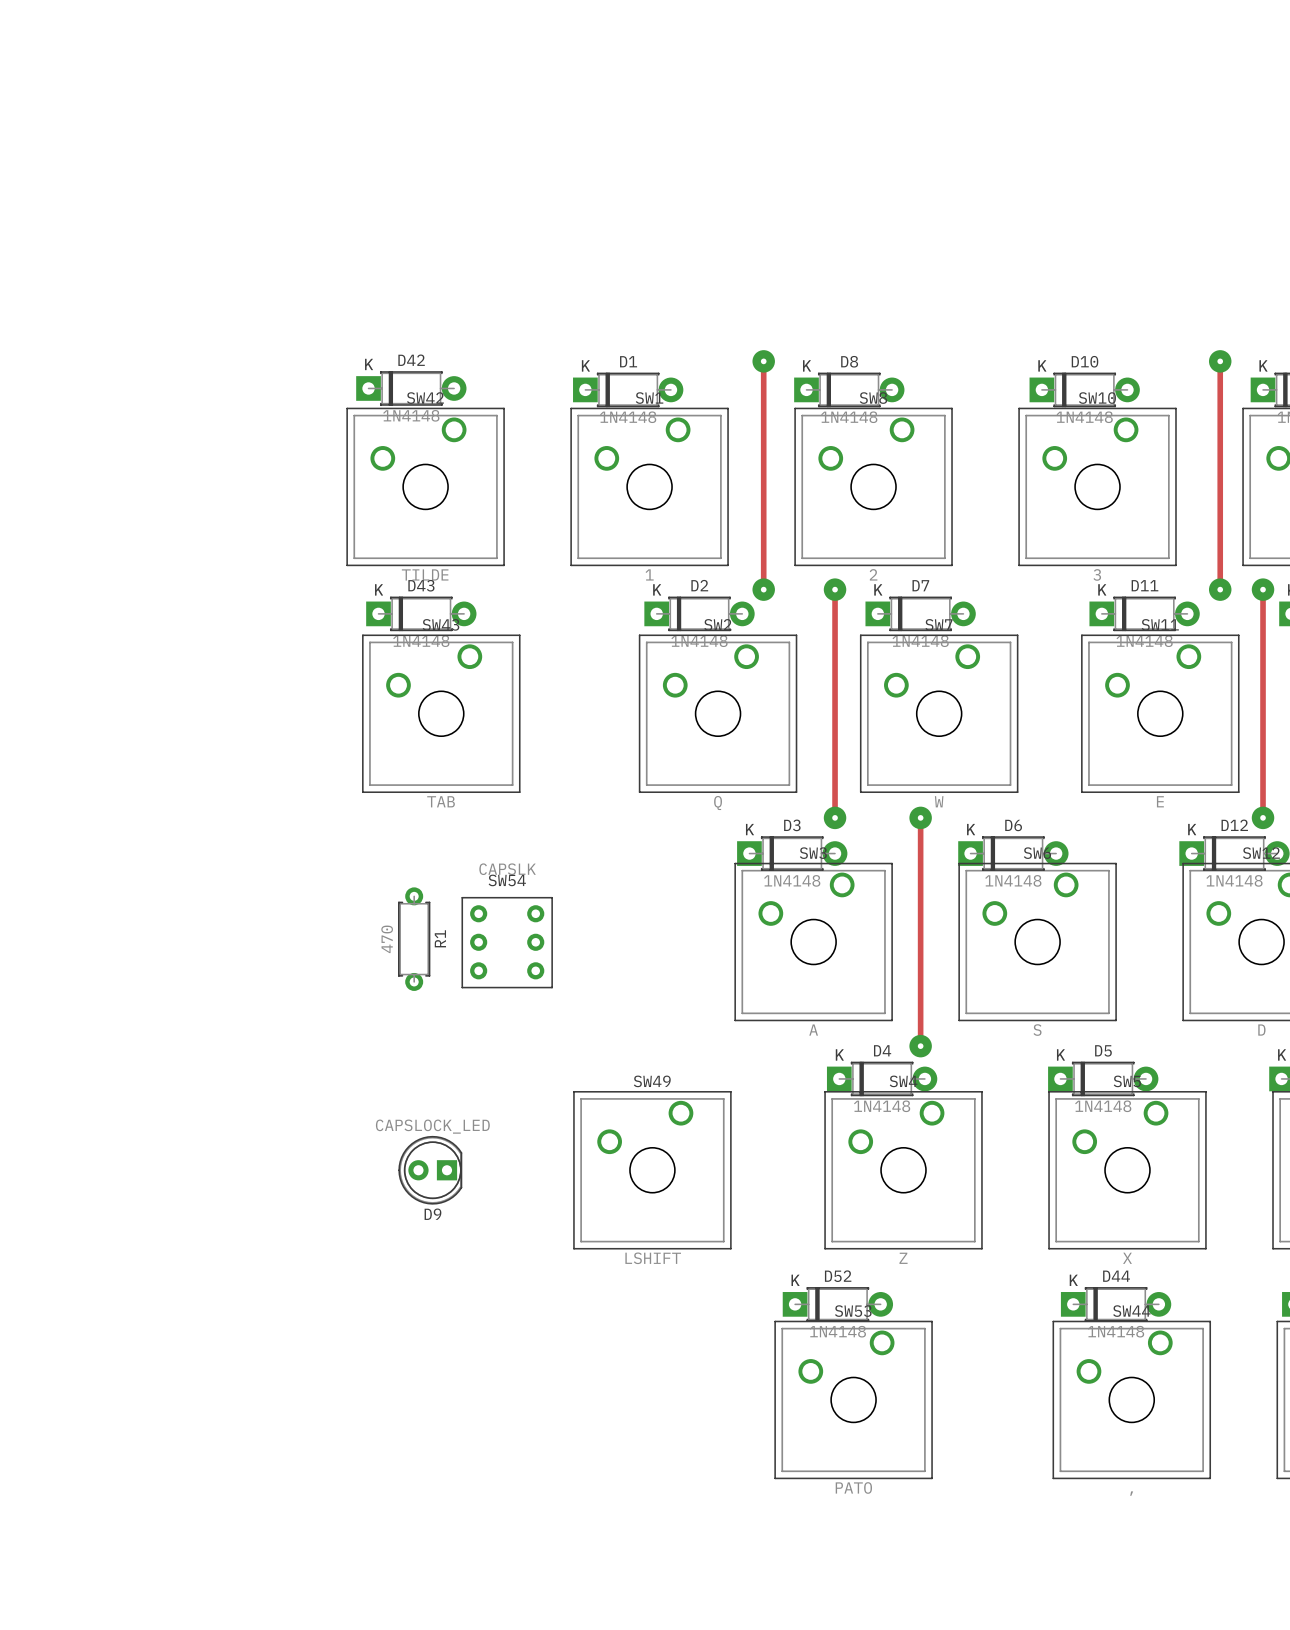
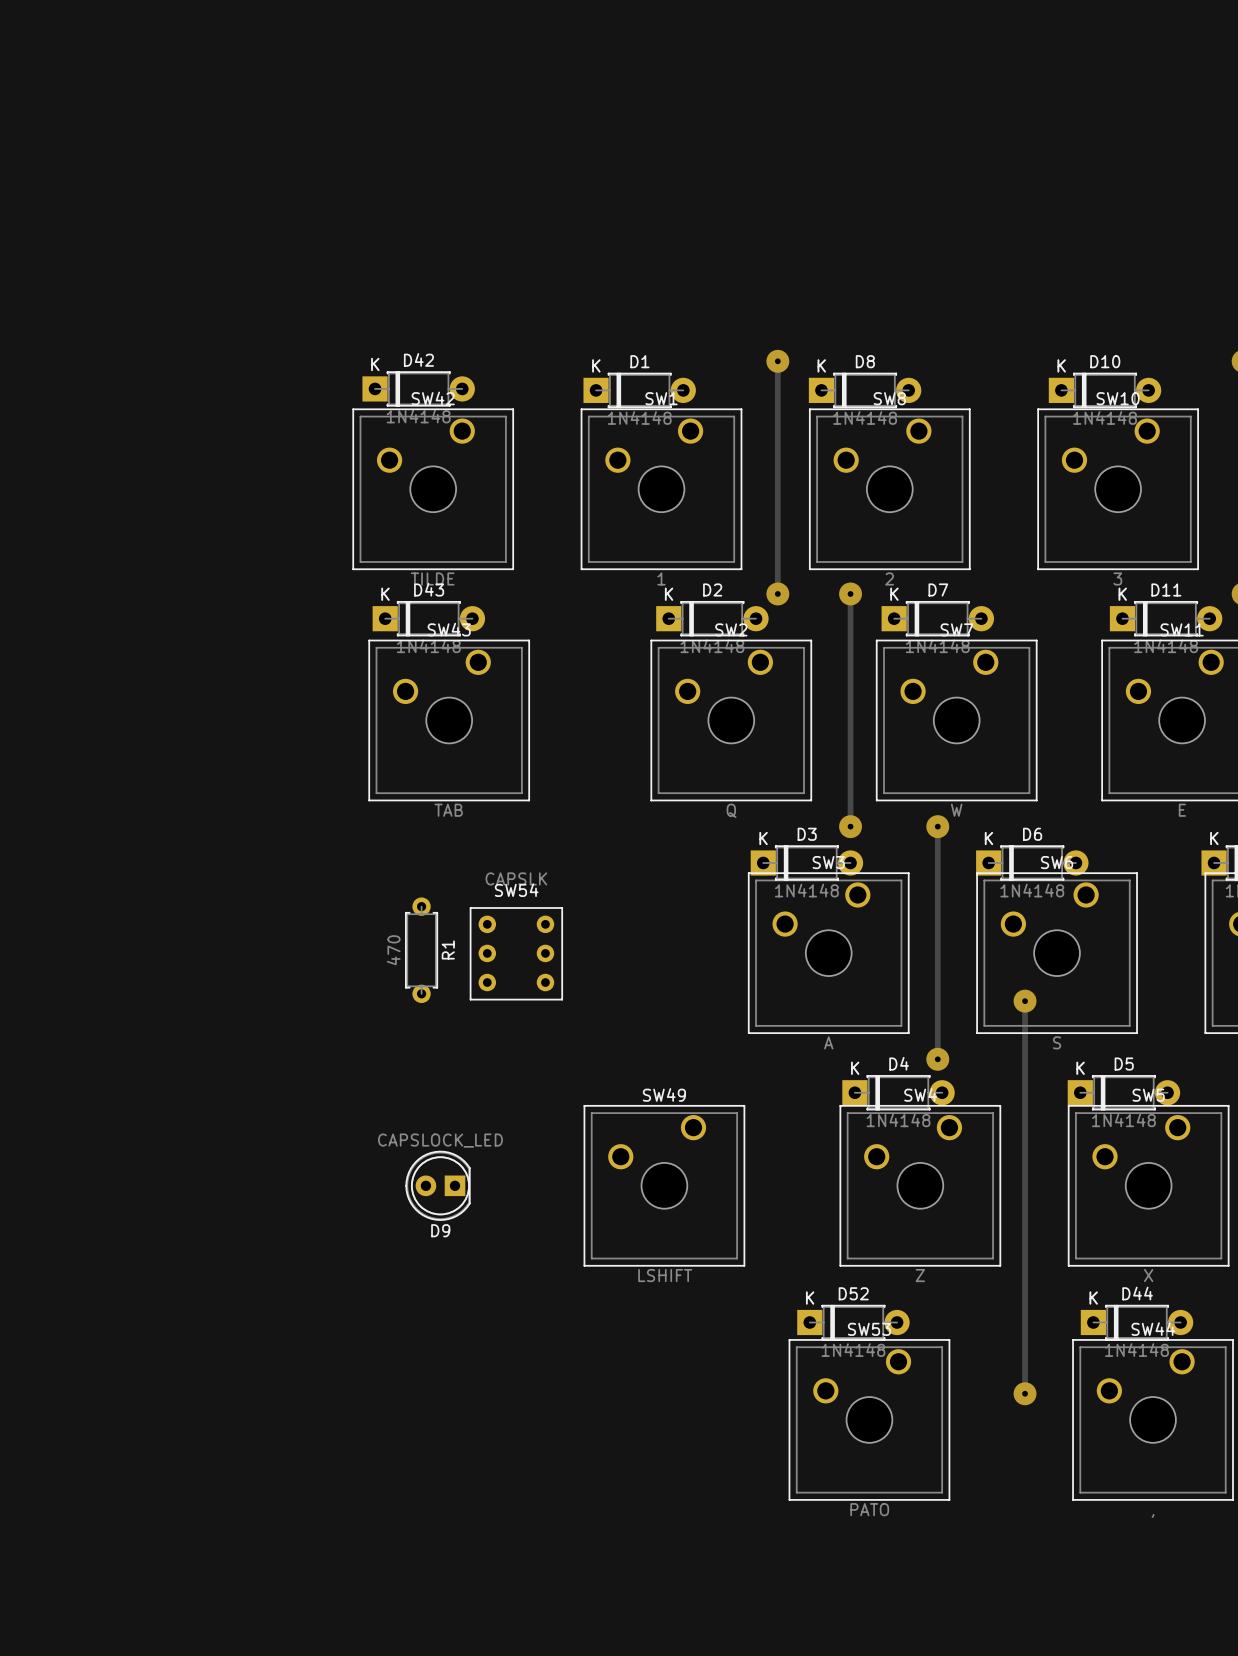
track: none -> (1025, 1001) (1025, 1393)
via: none -> (1025, 1001)
via: none -> (1025, 1393)

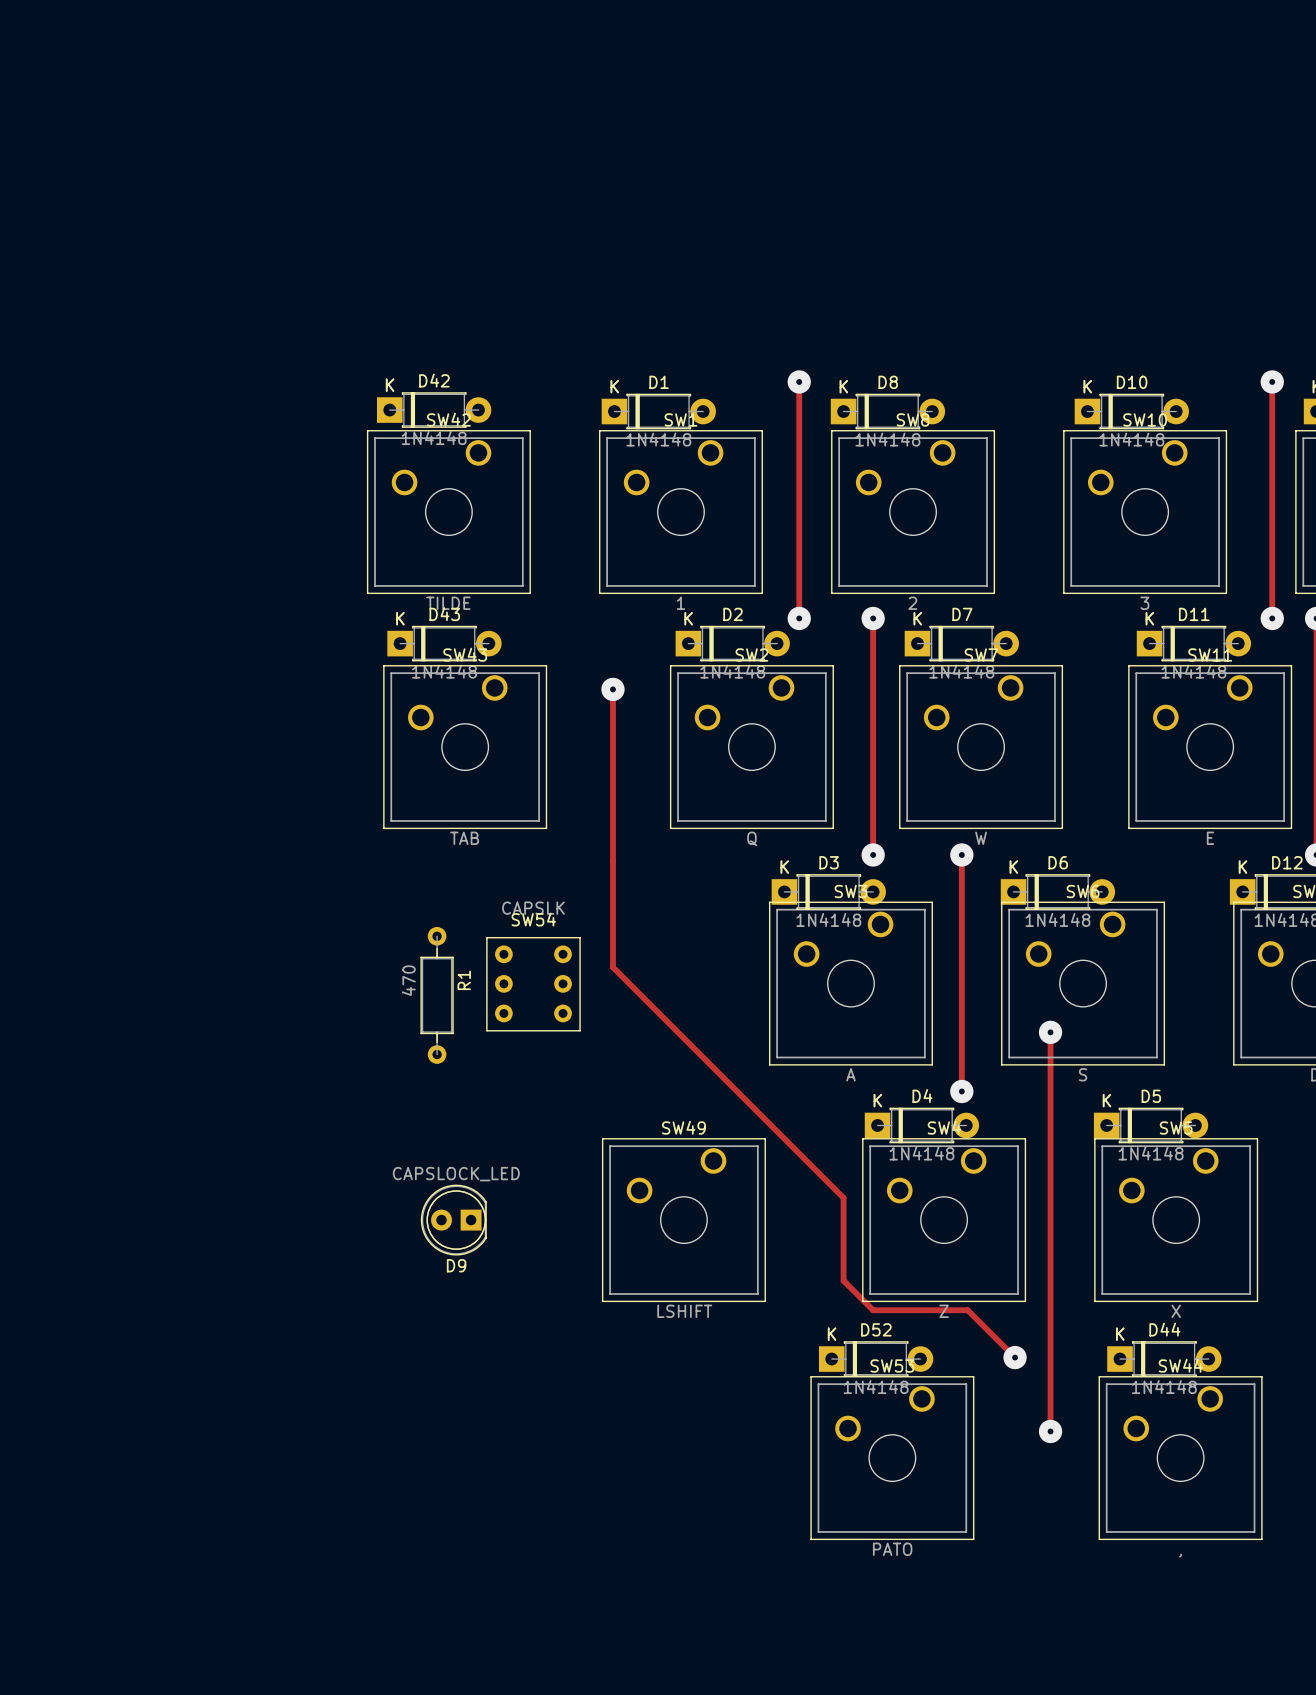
track: none -> (612, 689) (612, 967) (843, 1197) (843, 1280) (873, 1310) (967, 1310) (1015, 1357)
via: none -> (612, 689)
R1 footprint: [405, 897, 438, 1004] -> [420, 926, 454, 1064]
via: none -> (1015, 1357)

